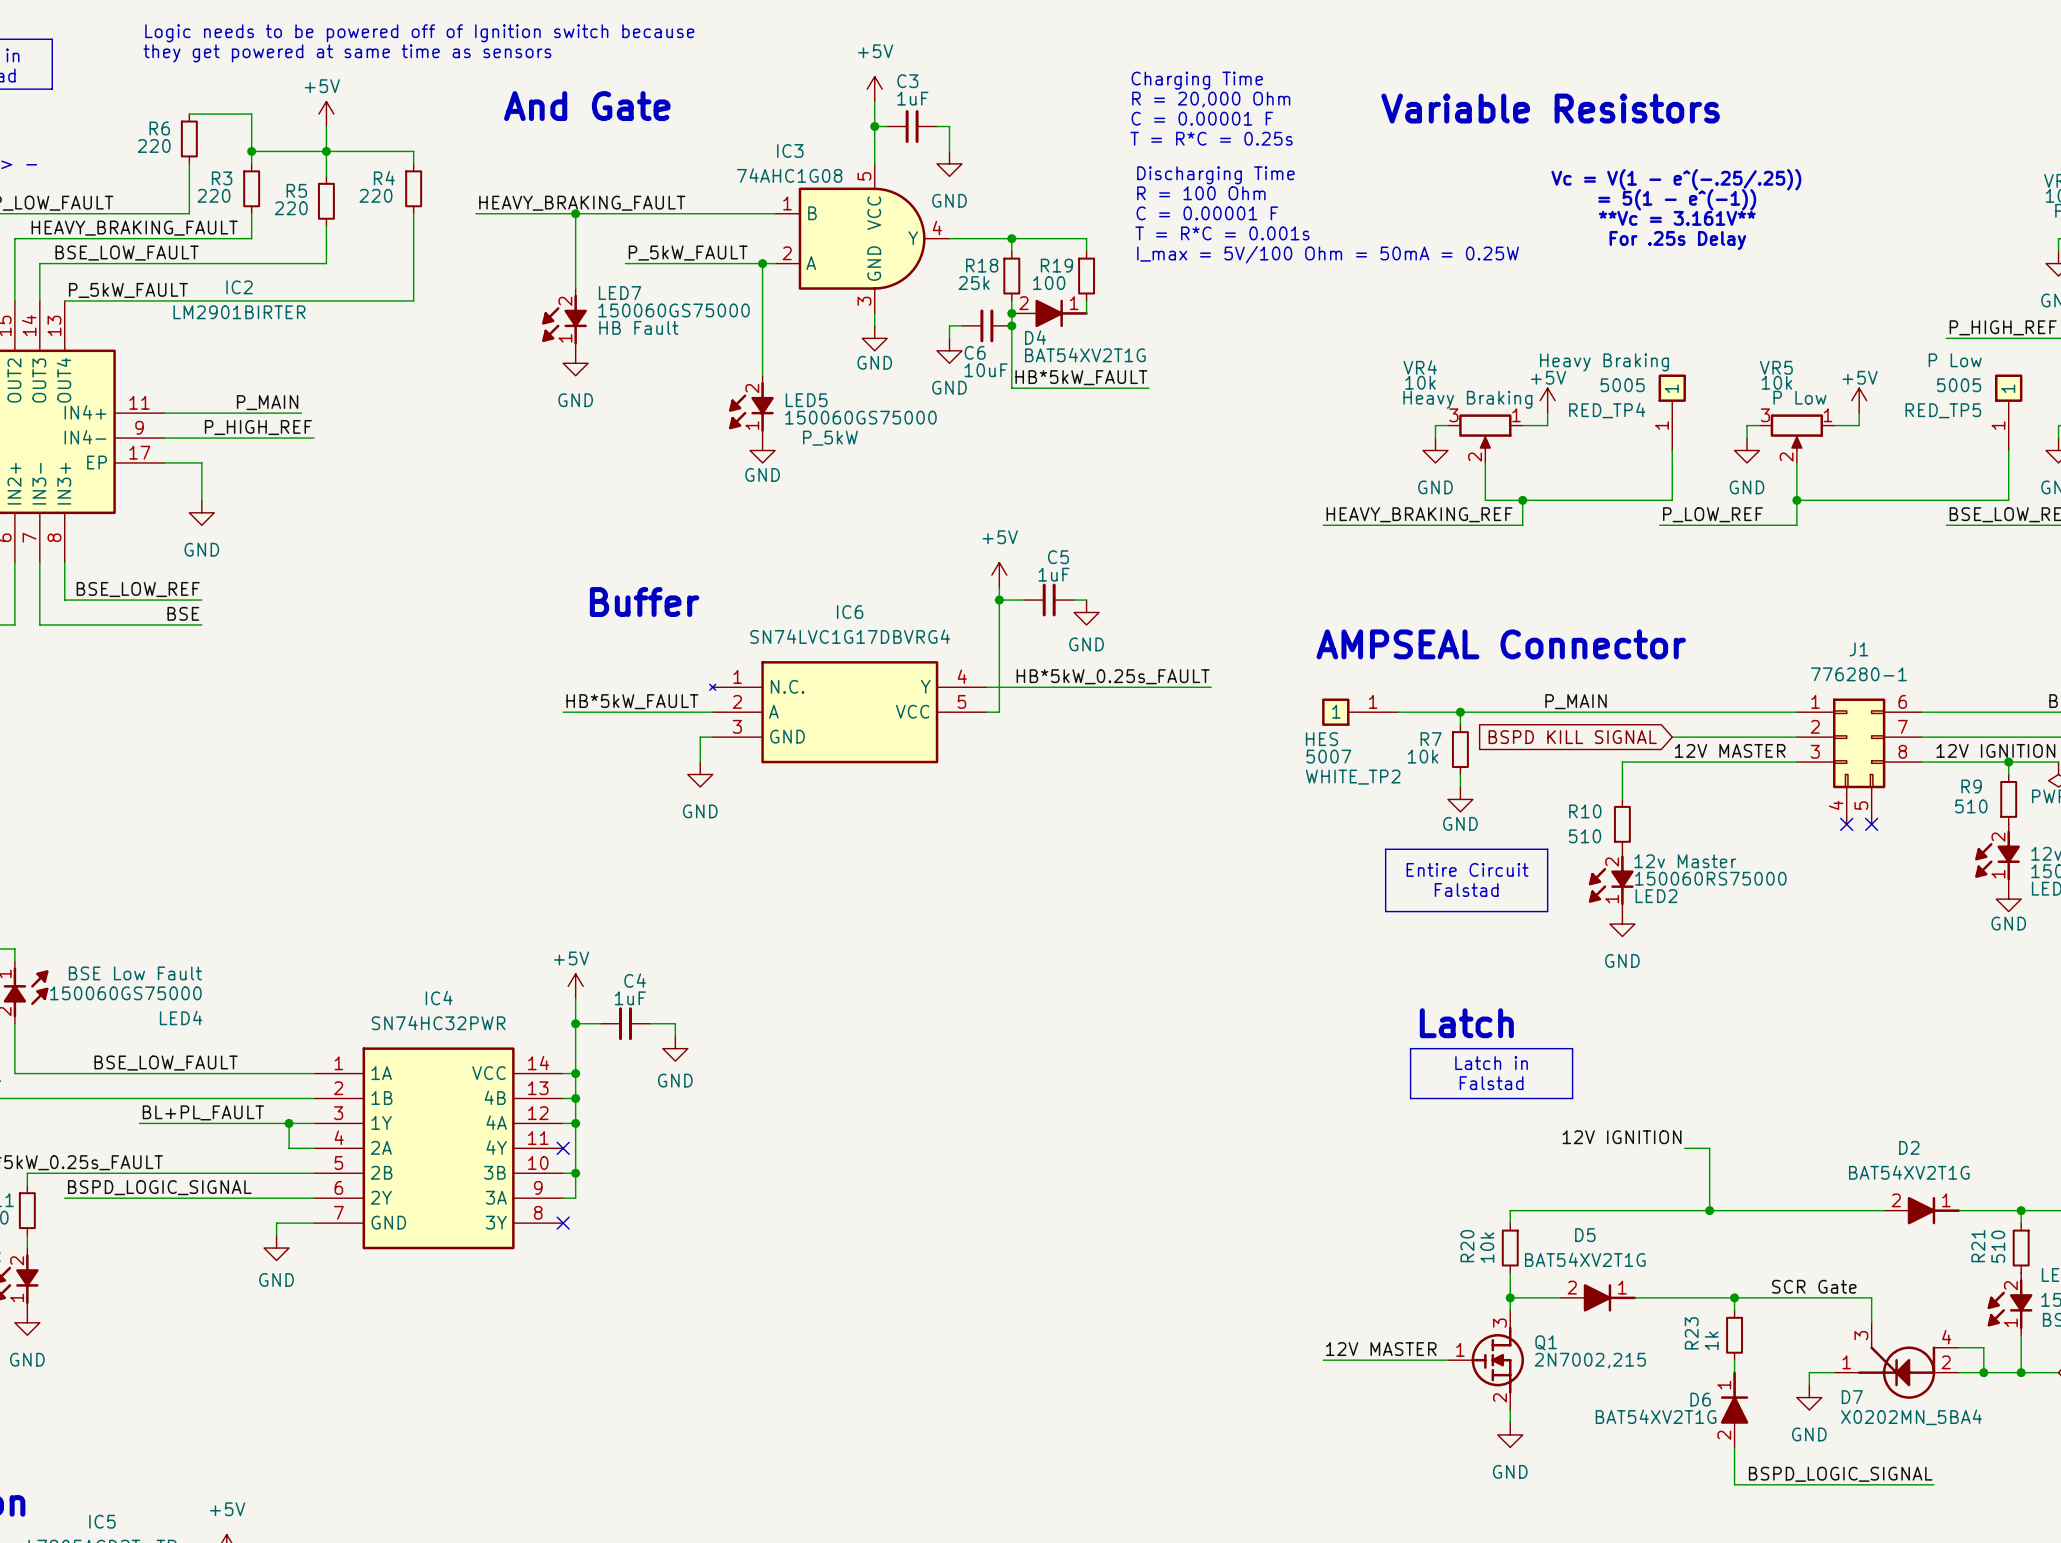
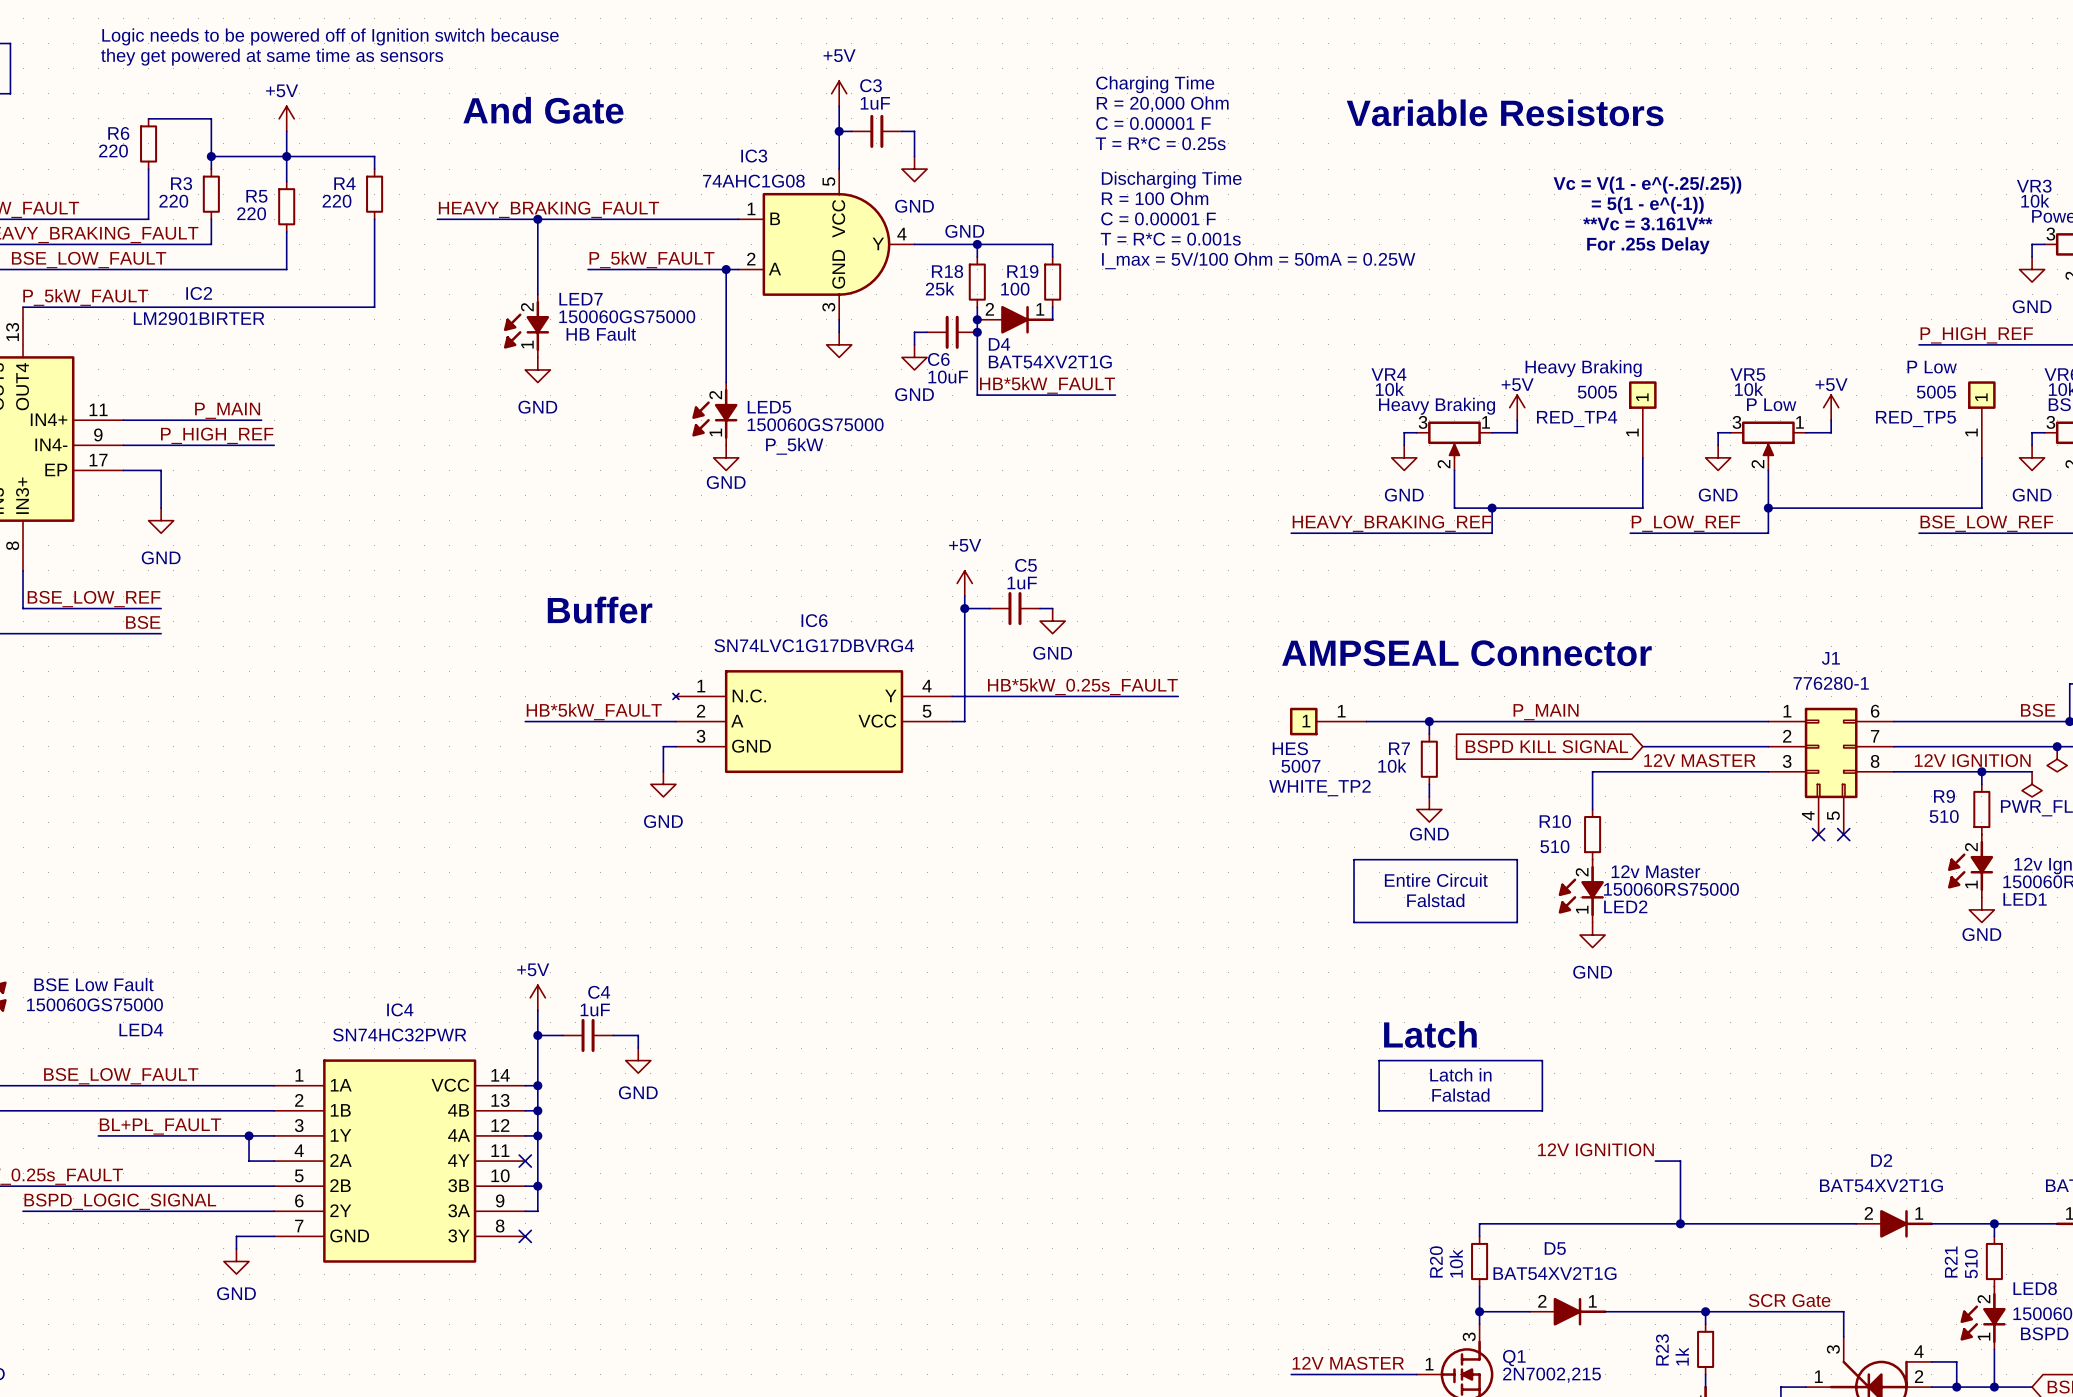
power symbol text position: GND (874, 362) -> GND (964, 231)

